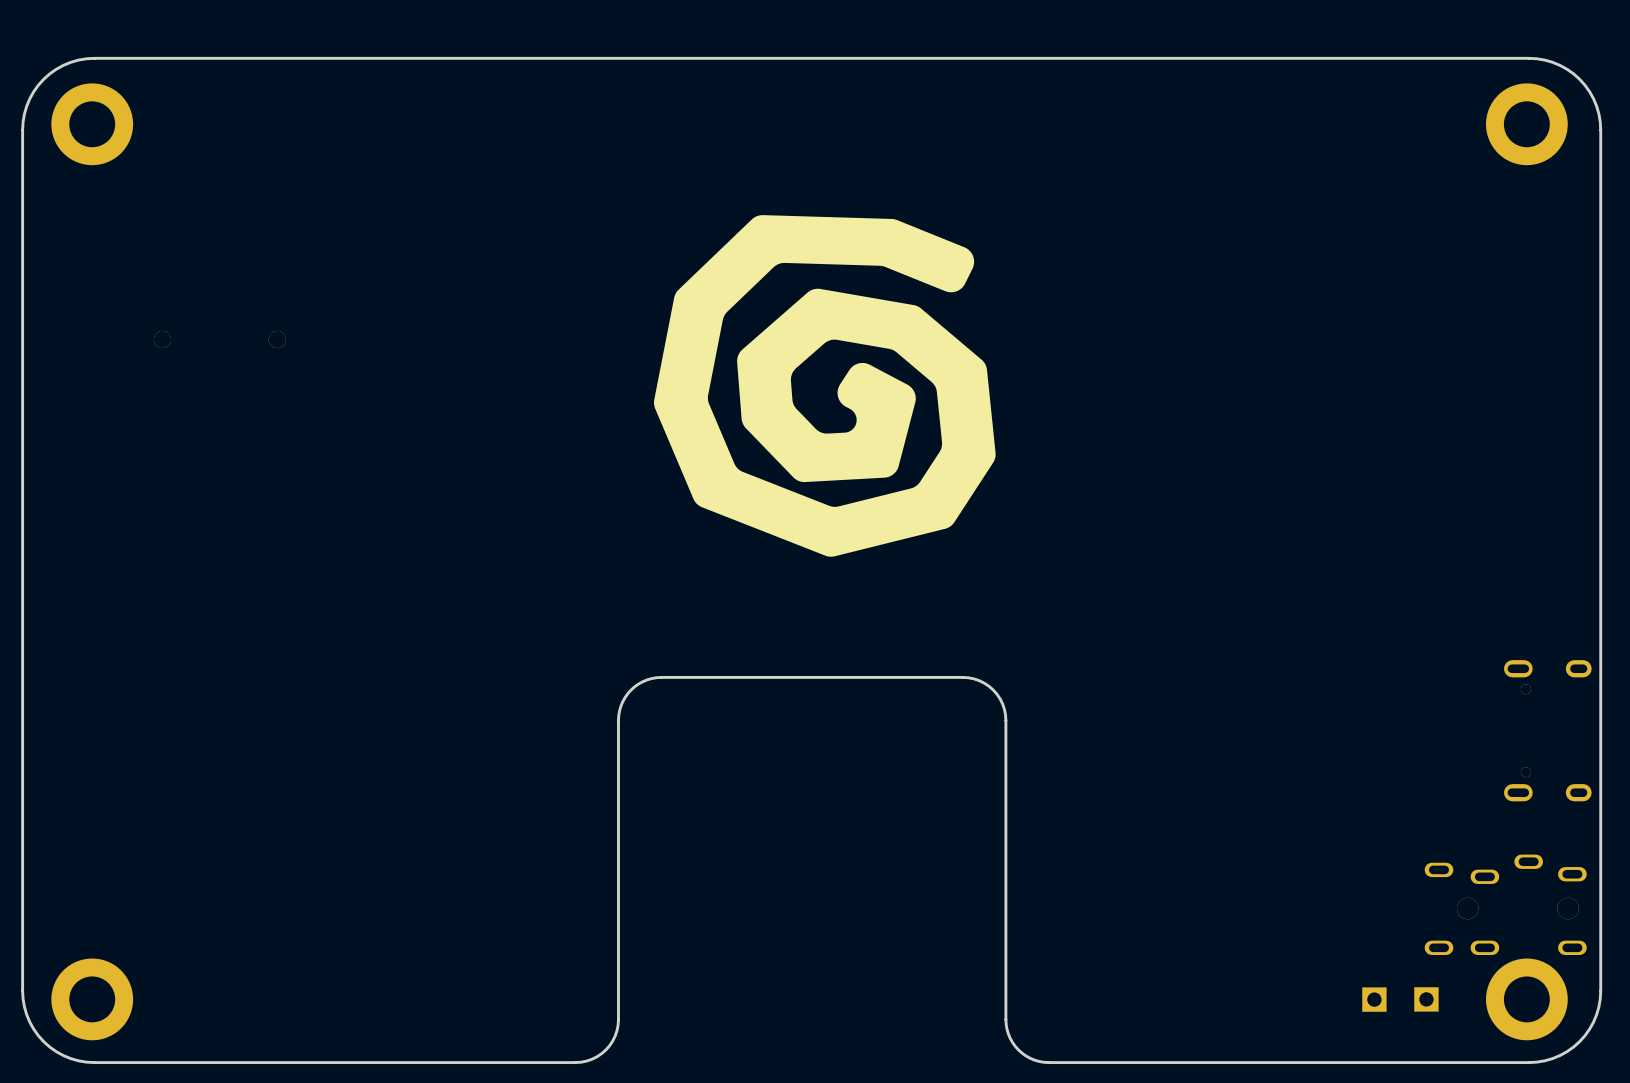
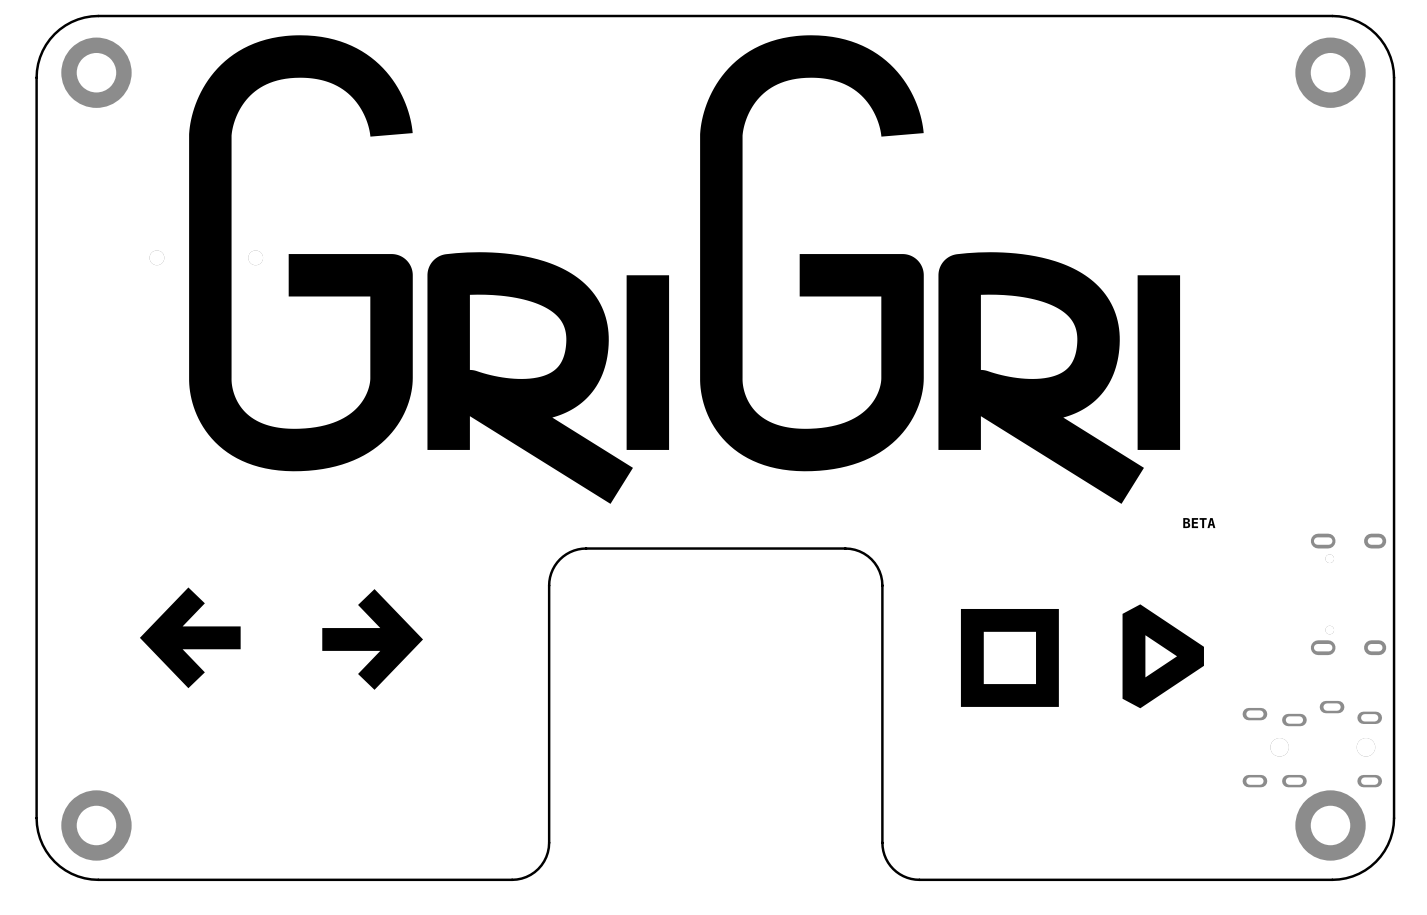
drawing: none -> [189, 35, 670, 504]
drawing: none -> [700, 35, 1181, 504]
drawing: [653, 215, 996, 557] -> none
text: none -> BETA (1199, 523)
drawing: none -> [139, 587, 241, 689]
drawing: none -> [322, 589, 424, 690]
drawing: none -> [1122, 604, 1204, 709]
drawing: none -> [960, 608, 1059, 707]
part: (1374, 999) -> none
part: (1426, 999) -> none

